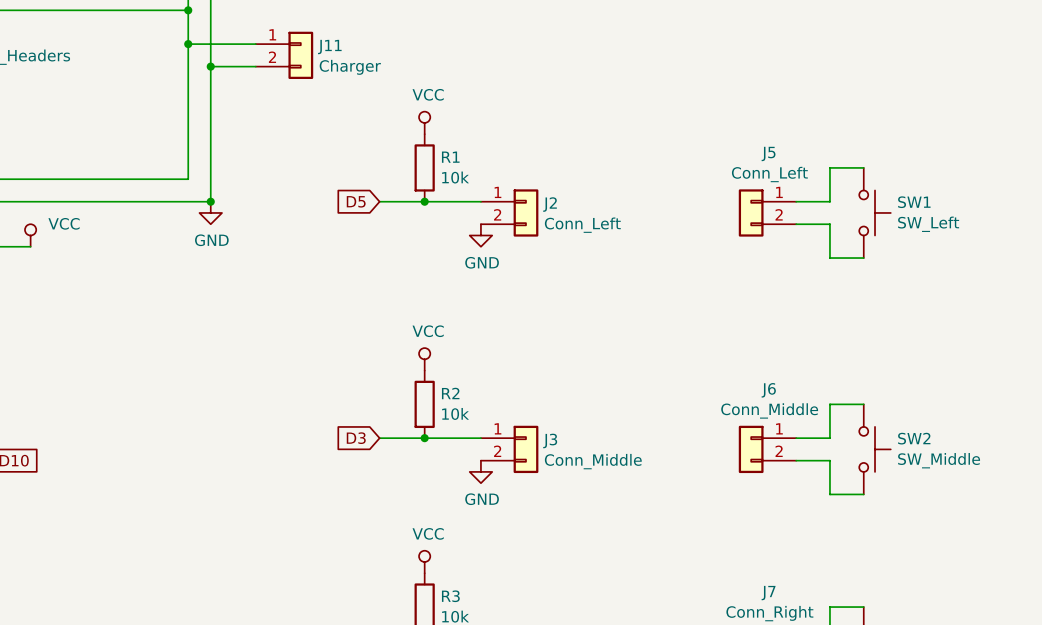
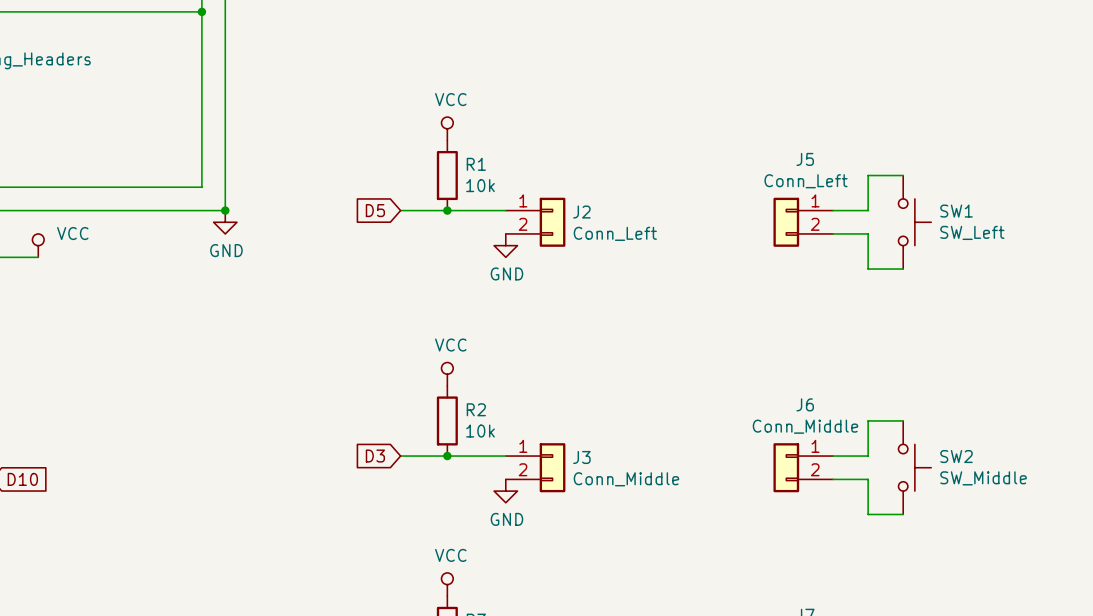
wire: (188, 44) (255, 44) -> none
junction: (188, 44) -> none
J11: Charger (284, 55) -> none
wire: (210, 66) (255, 66) -> none
junction: (210, 66) -> none

